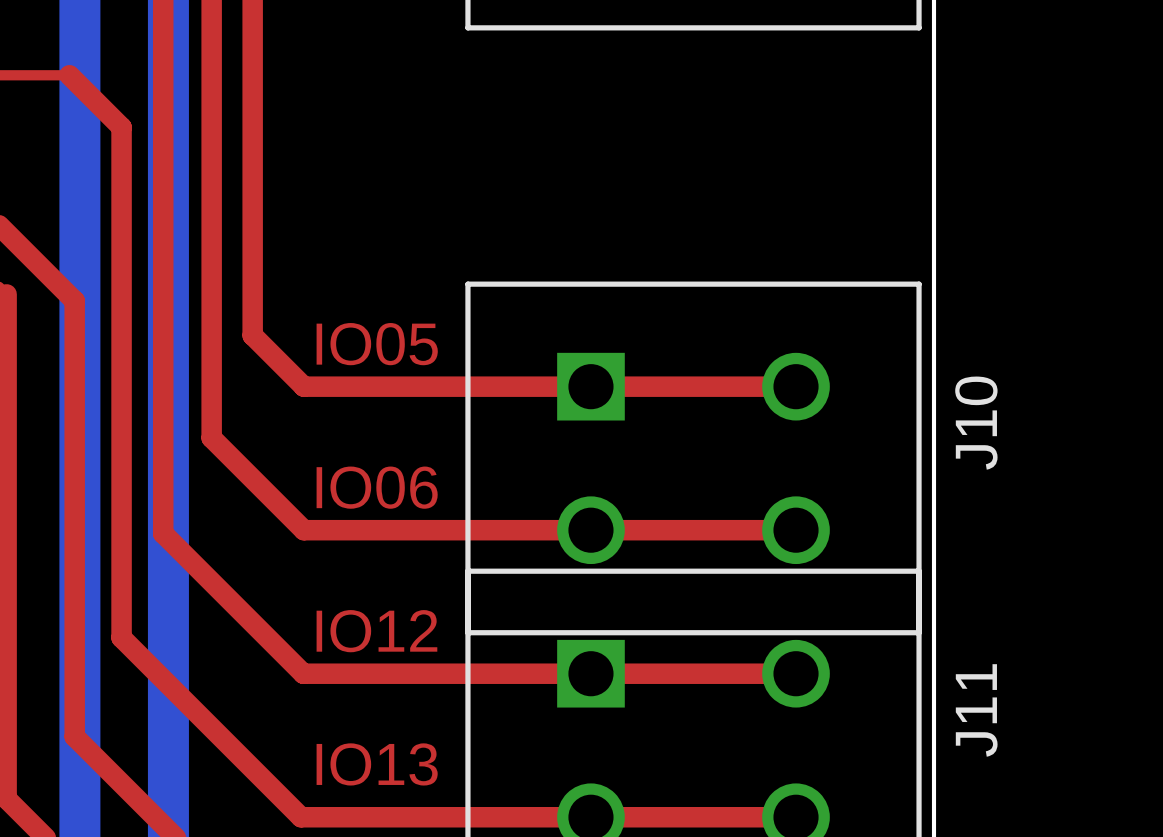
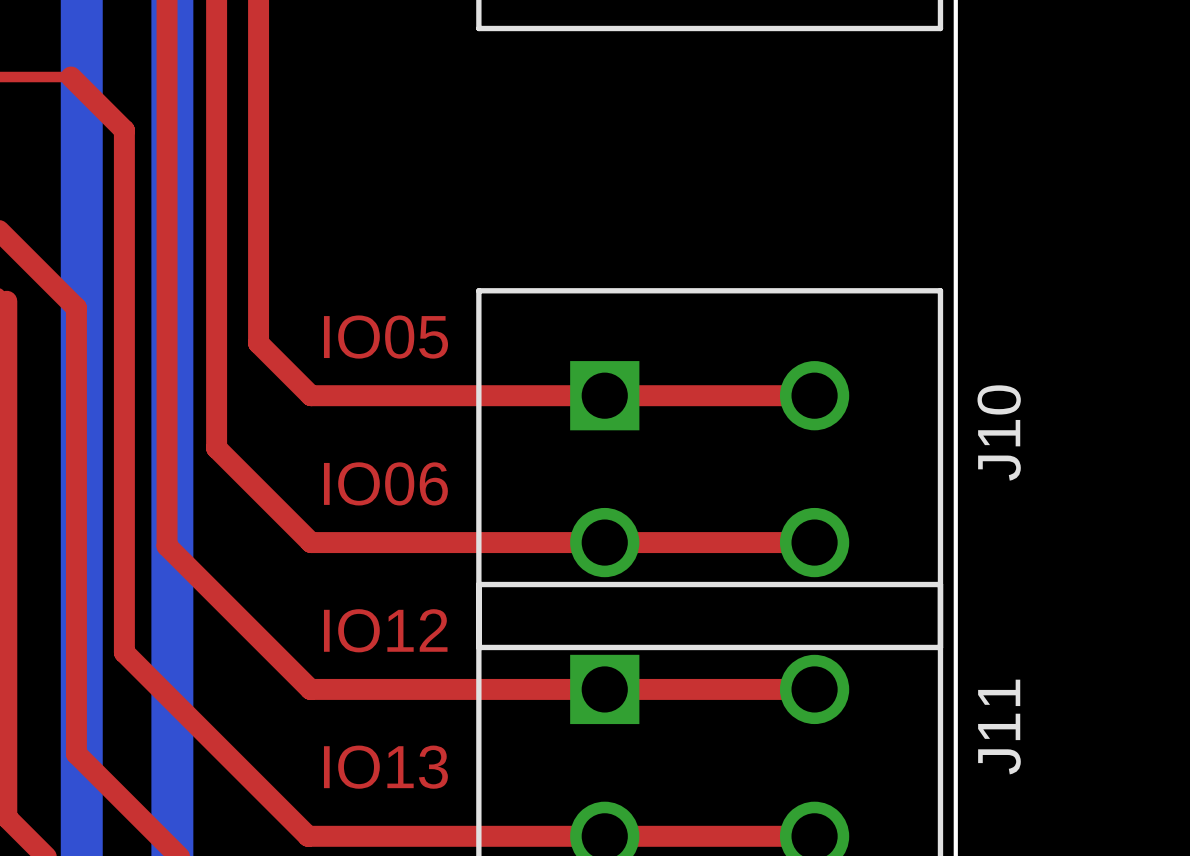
text position: IO05 (377, 344) -> IO05 (385, 337)
text position: IO06 (377, 487) -> IO06 (385, 483)
text position: IO12 (376, 631) -> IO12 (385, 630)
text position: IO13 (377, 764) -> IO13 (385, 767)

